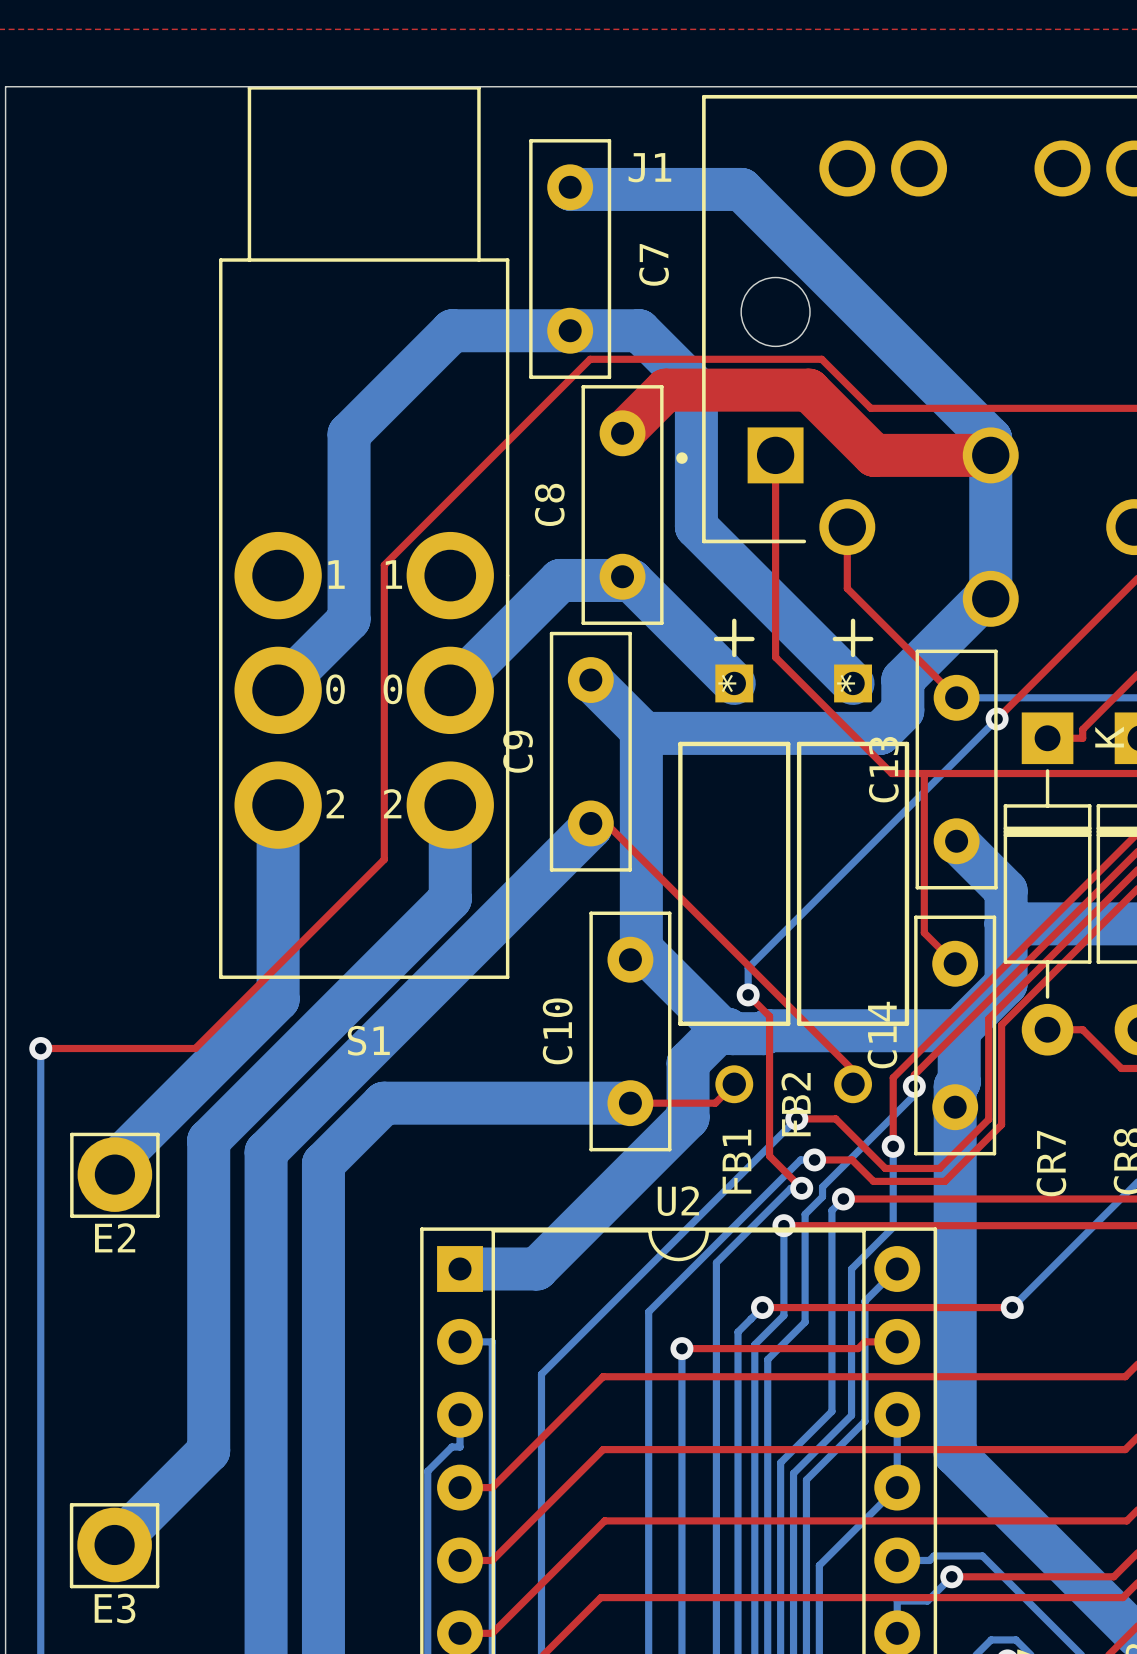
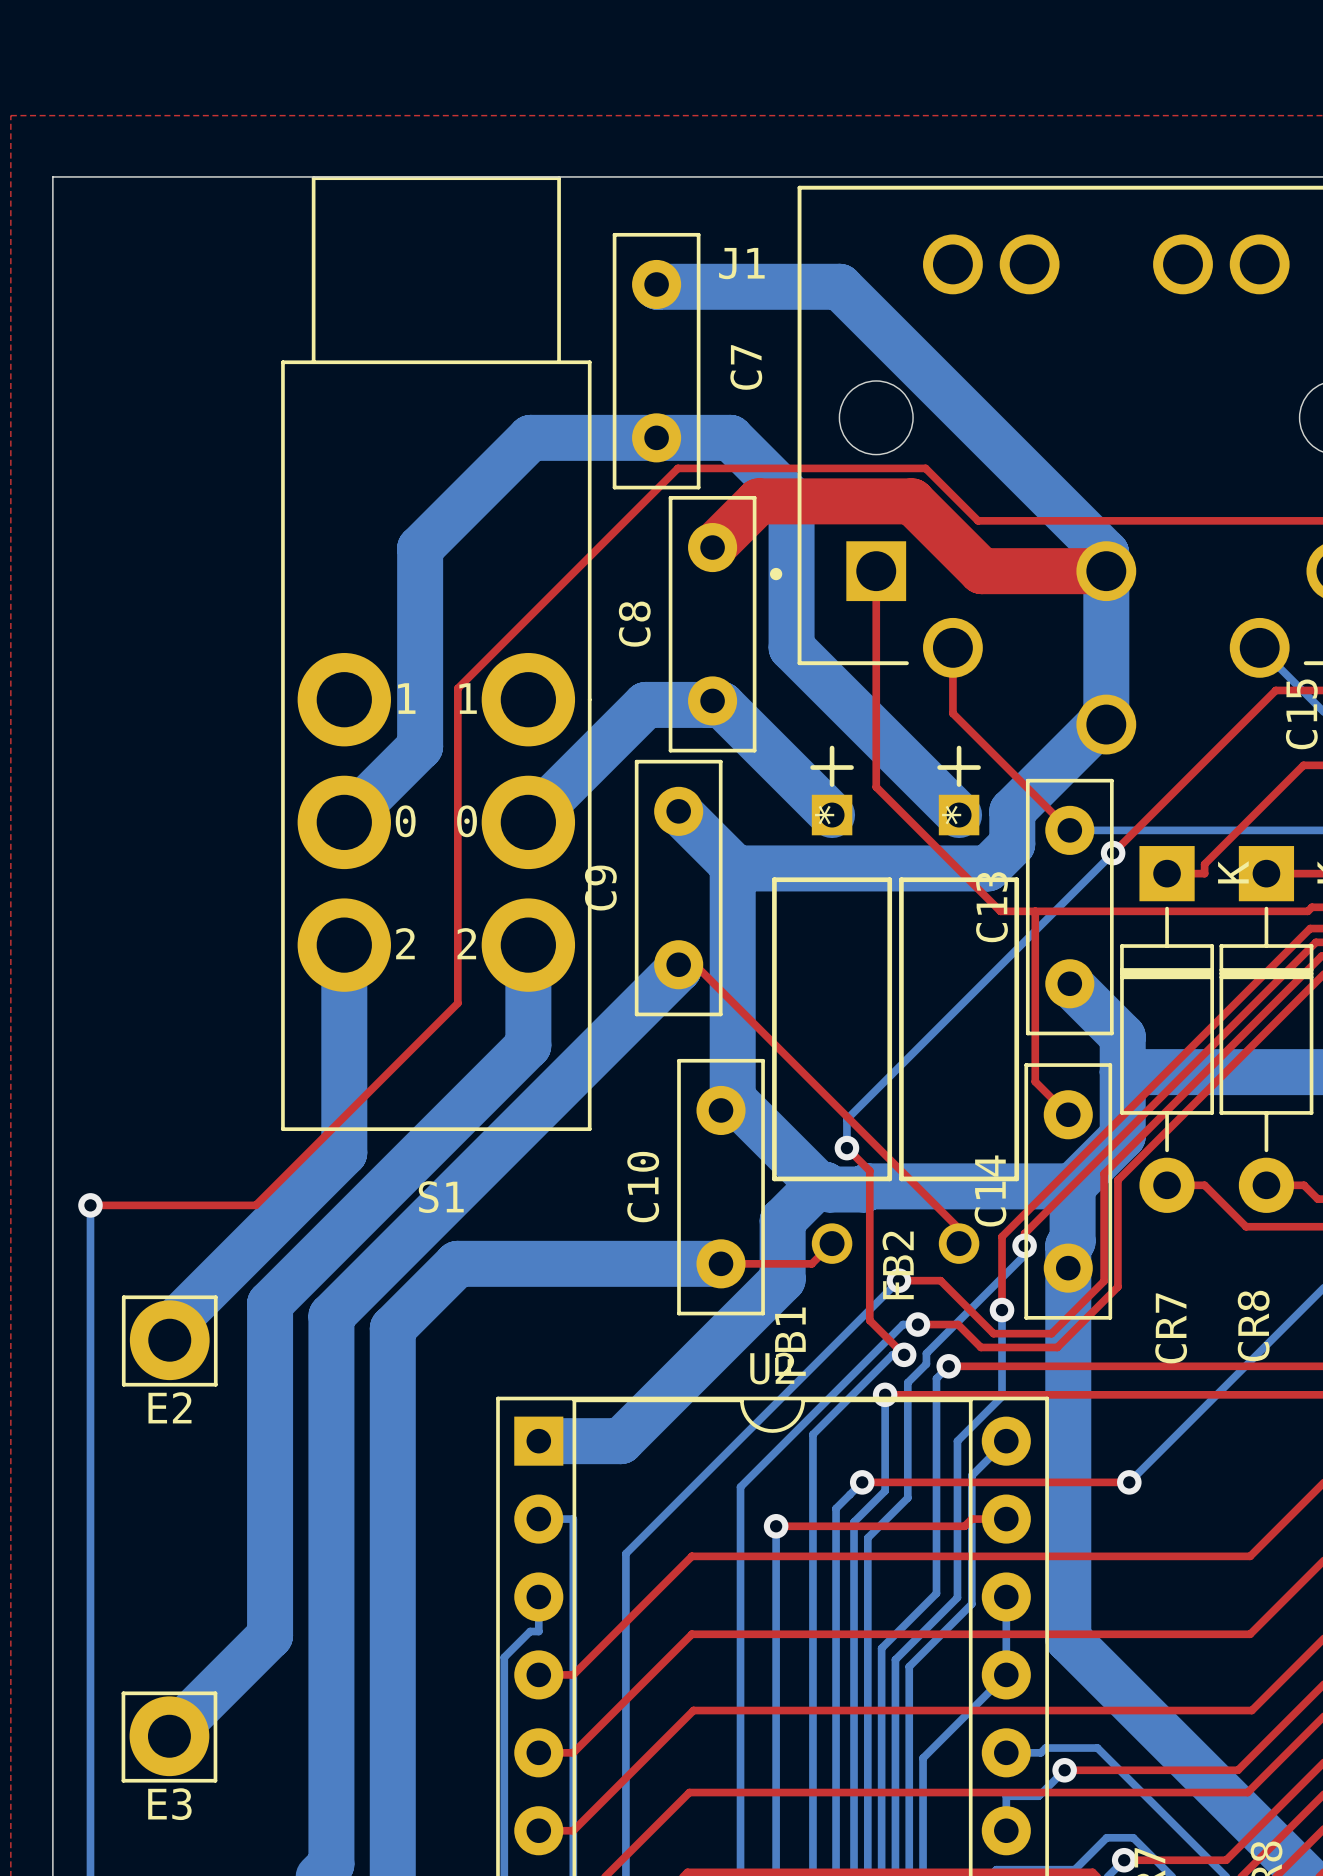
FB1 name position: FB1 (736, 1161) -> FB1 (790, 1341)

